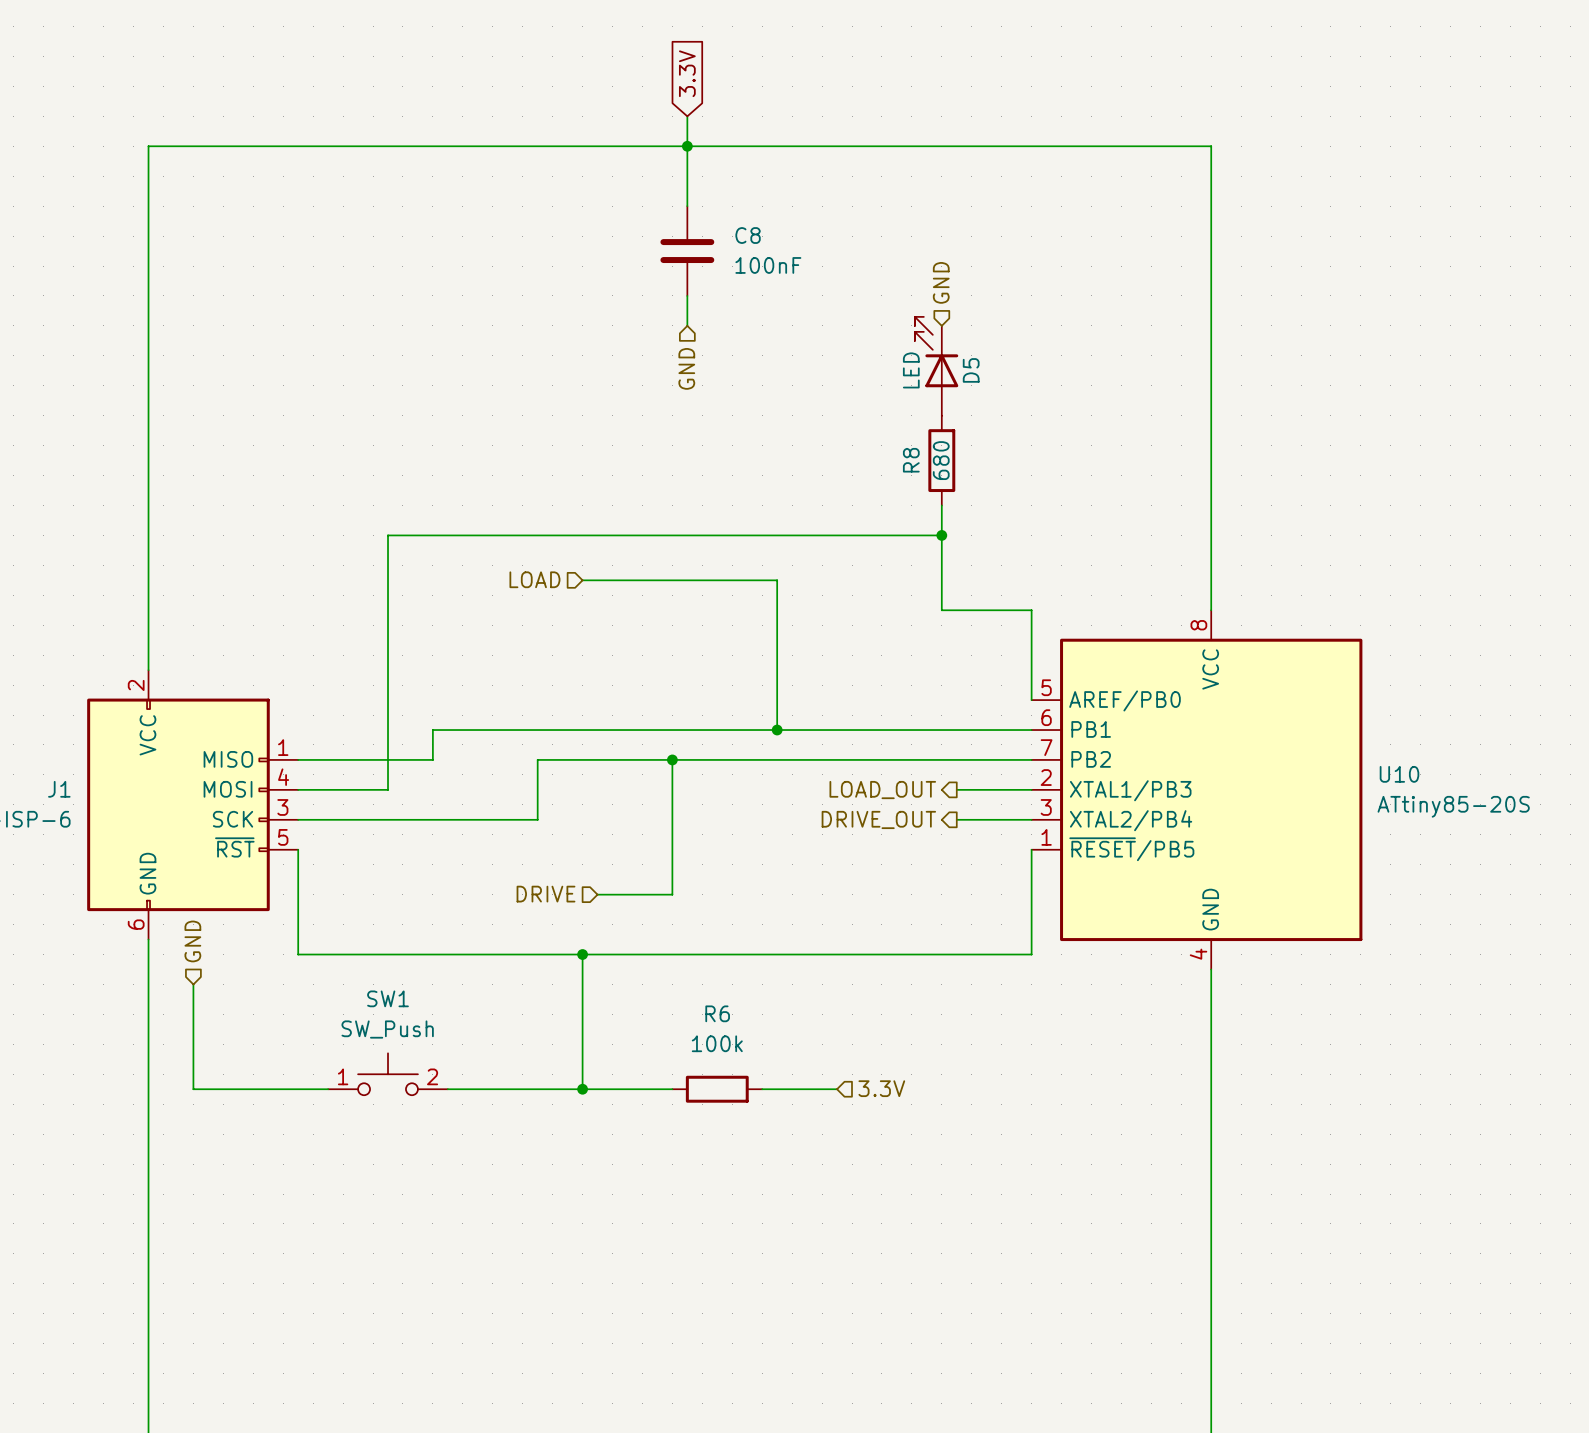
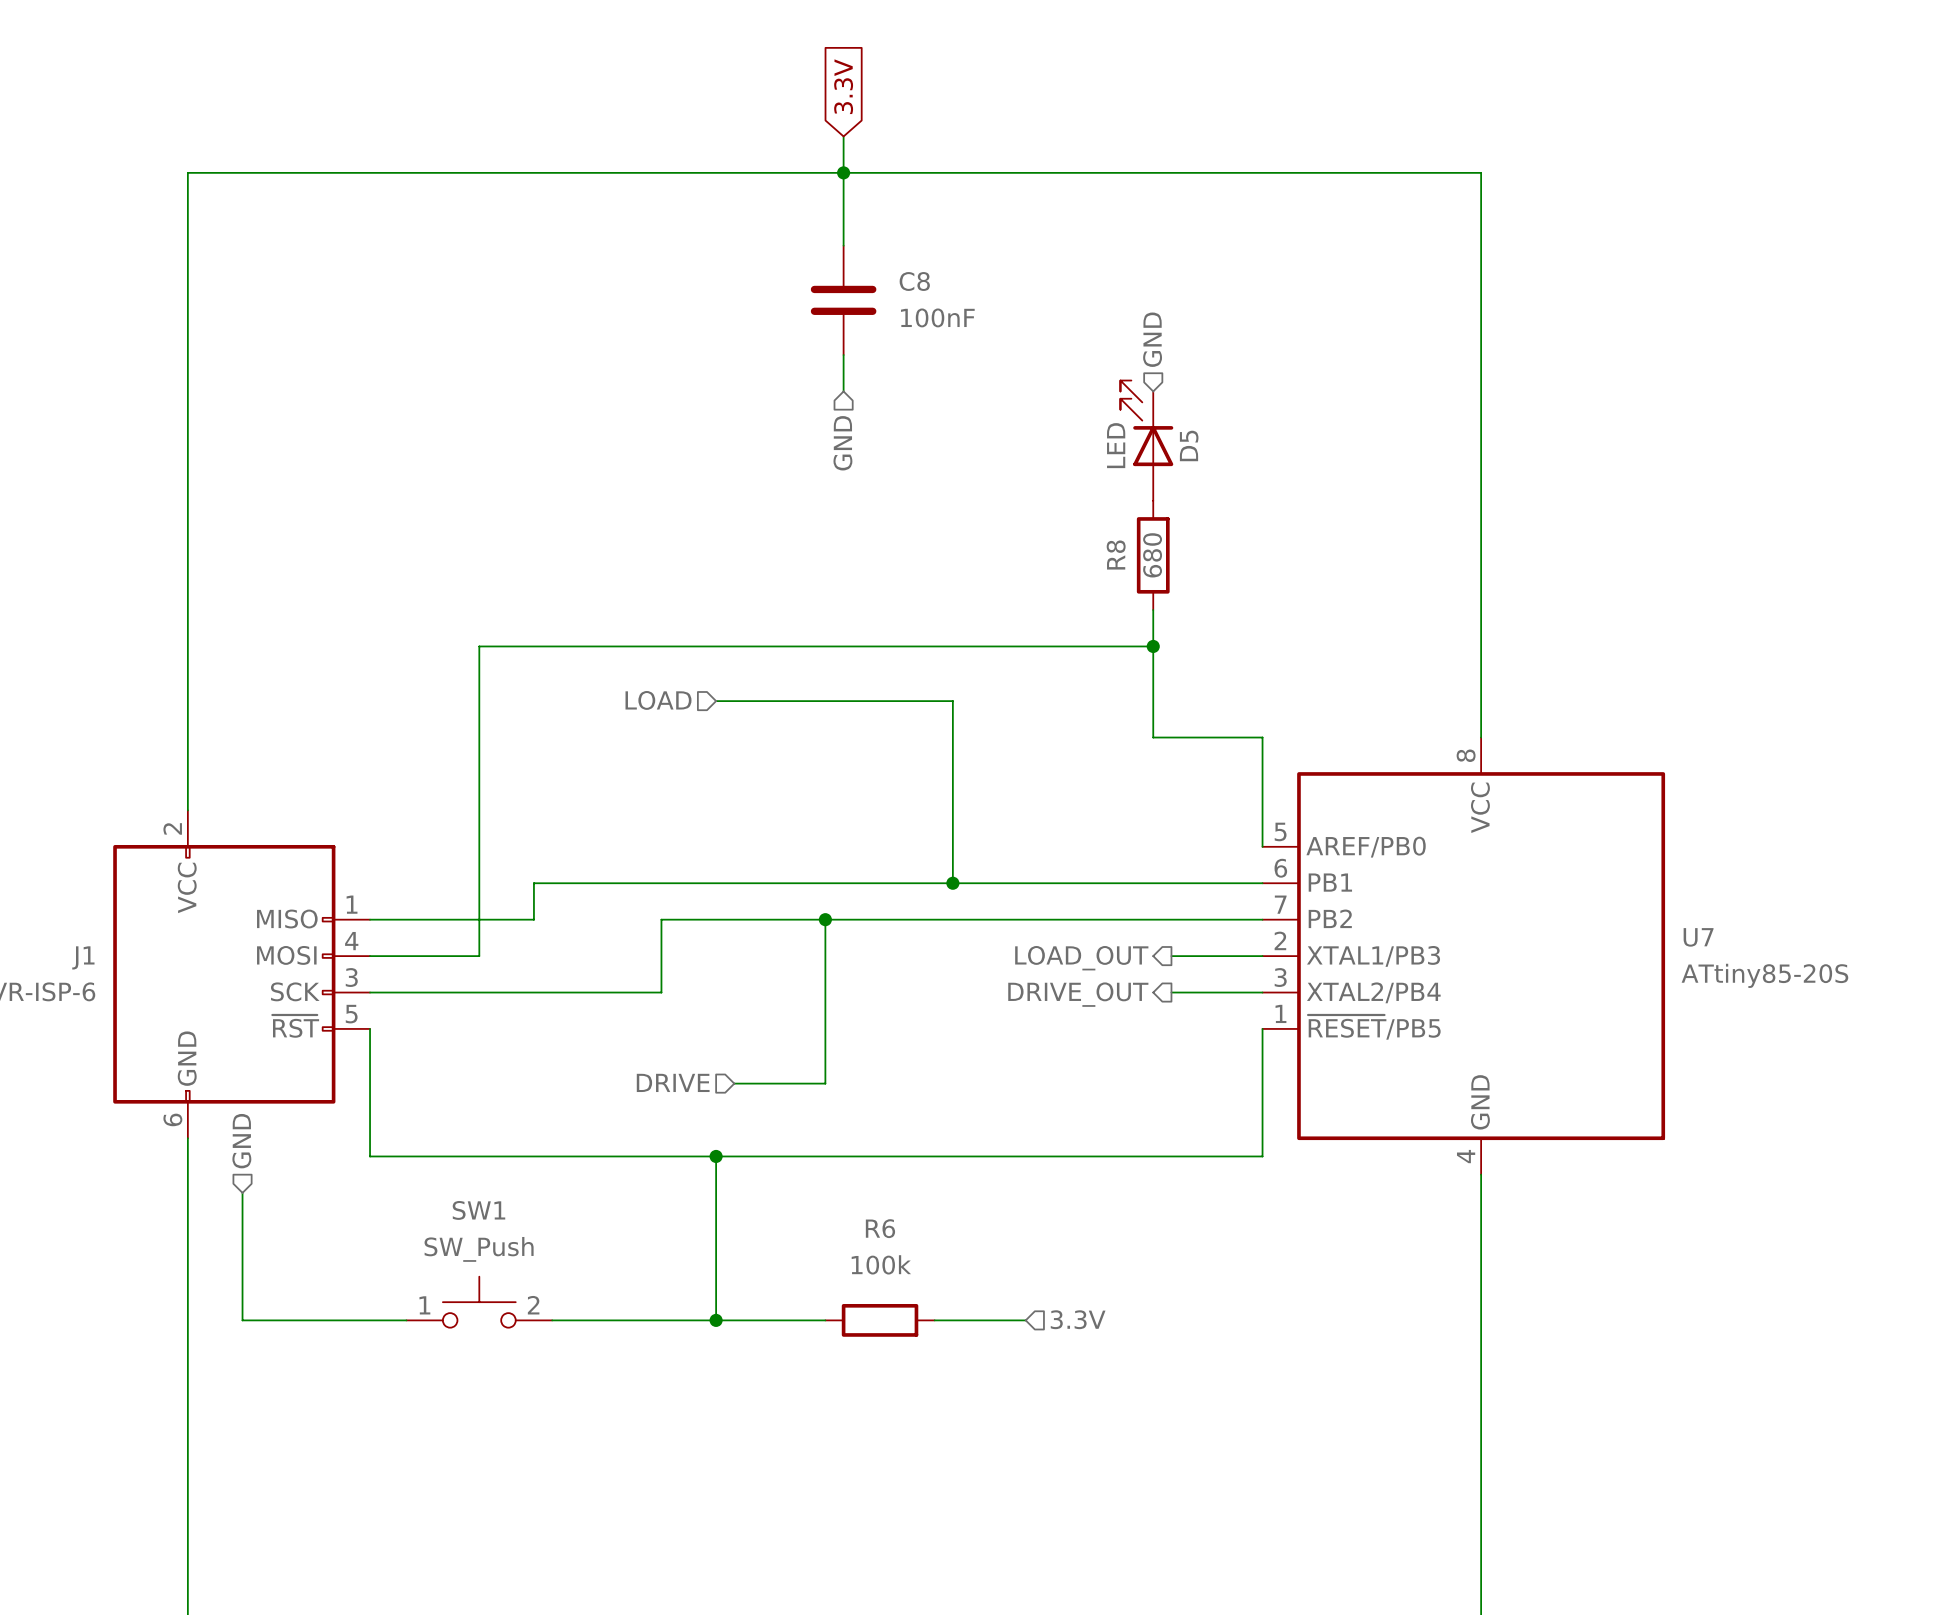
U10 name: U10 (1399, 774) -> U7 (1698, 937)

